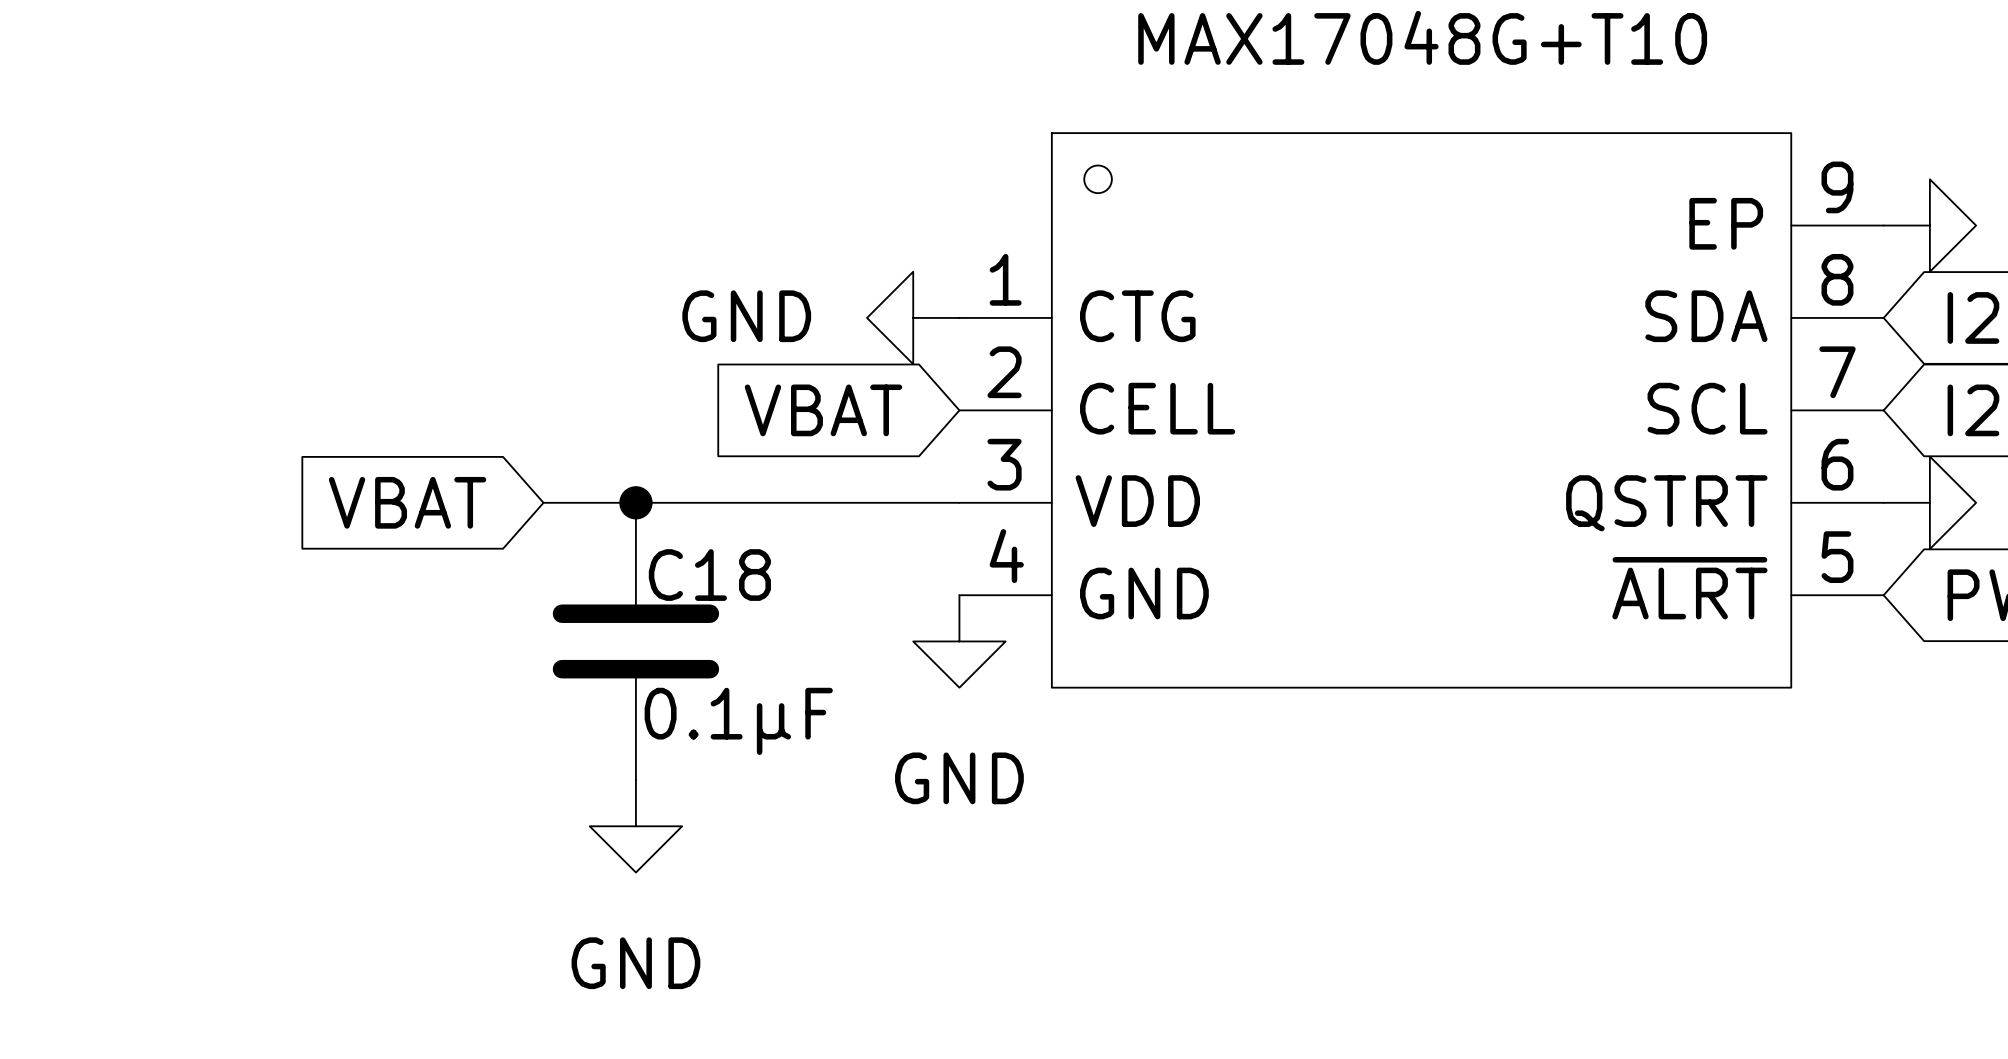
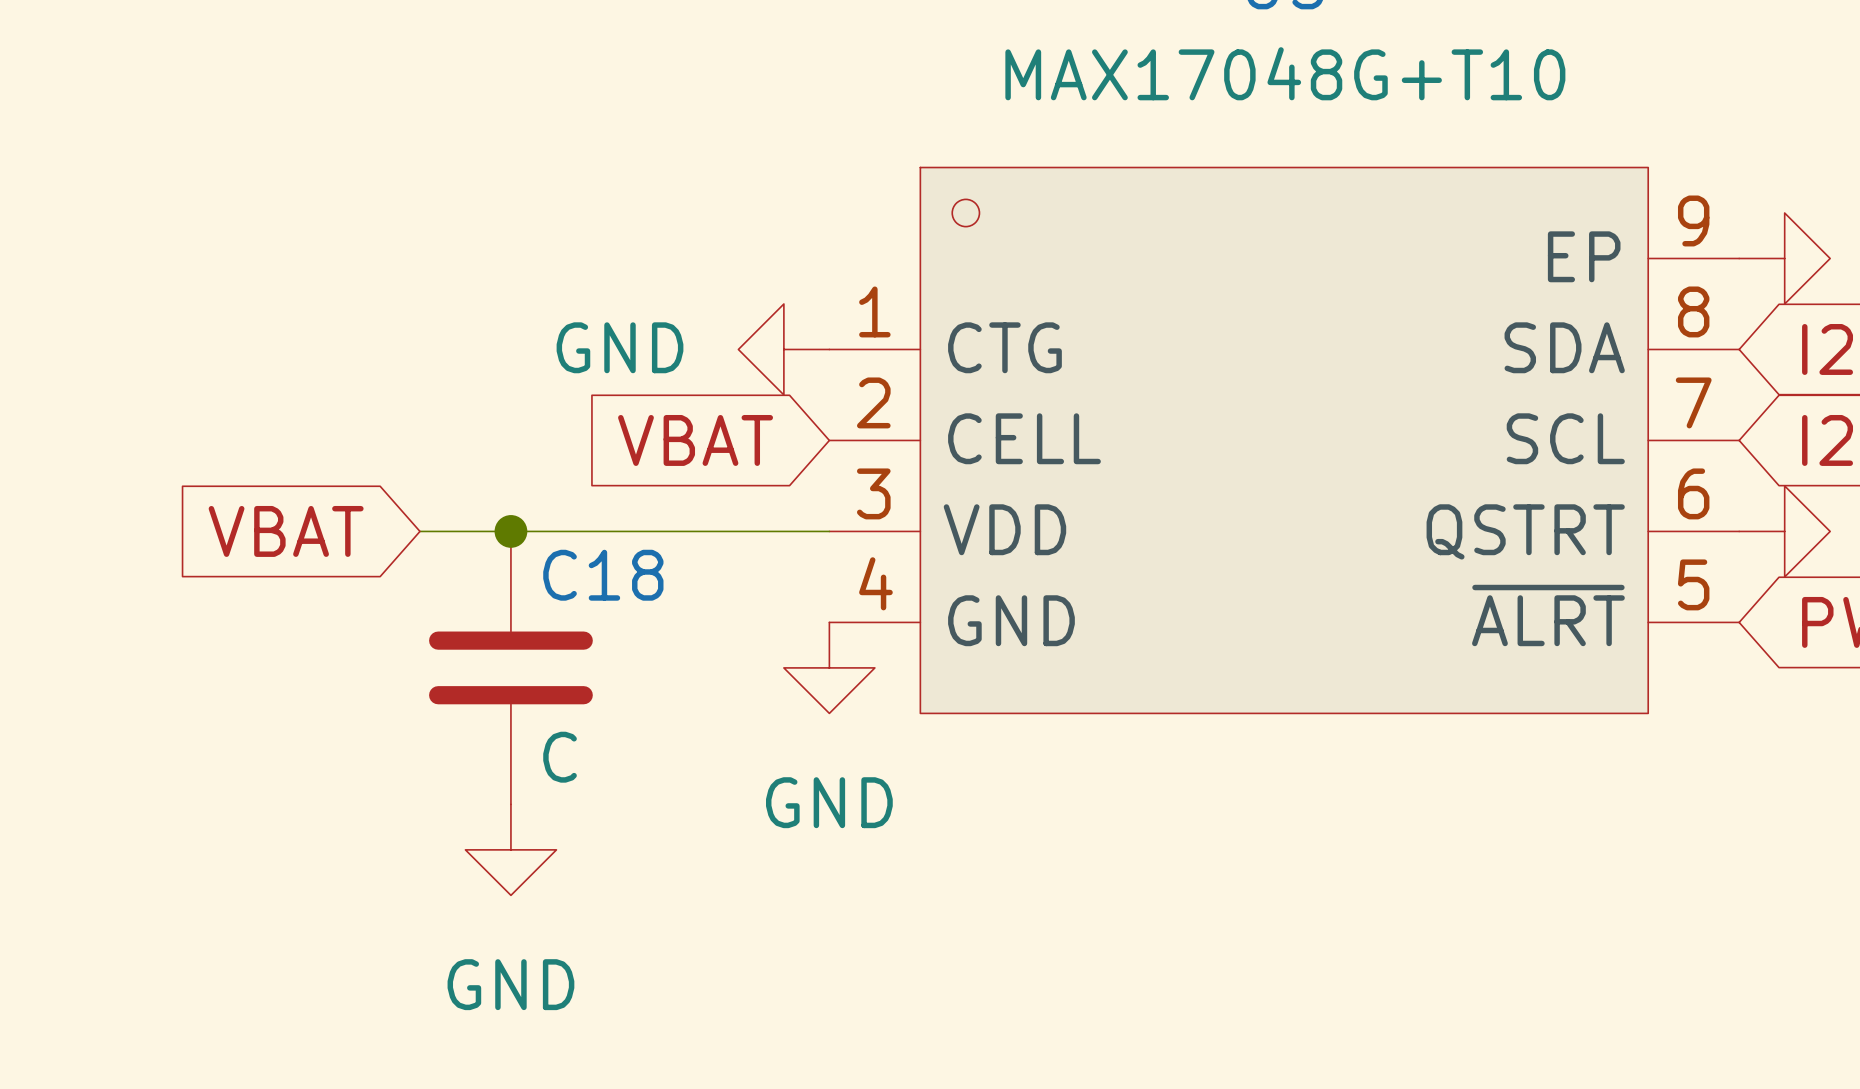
C18 name position: C18 (709, 575) -> C18 (603, 575)
C18 value: 0.1µF (738, 721) -> C (560, 757)

